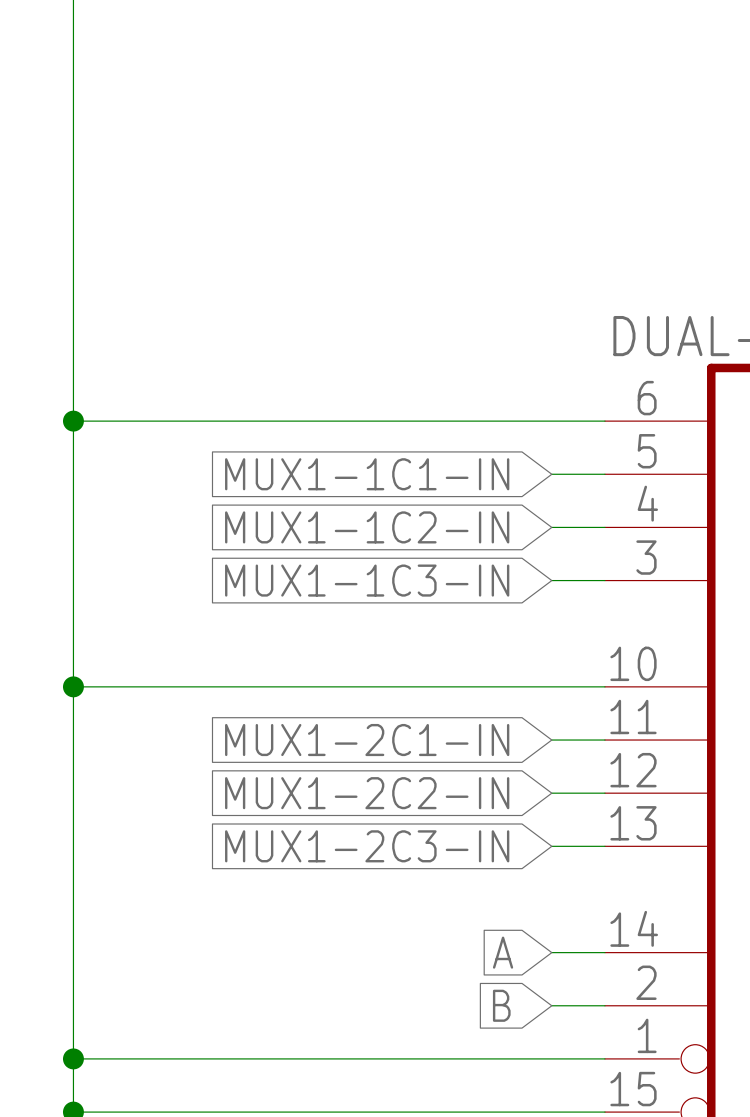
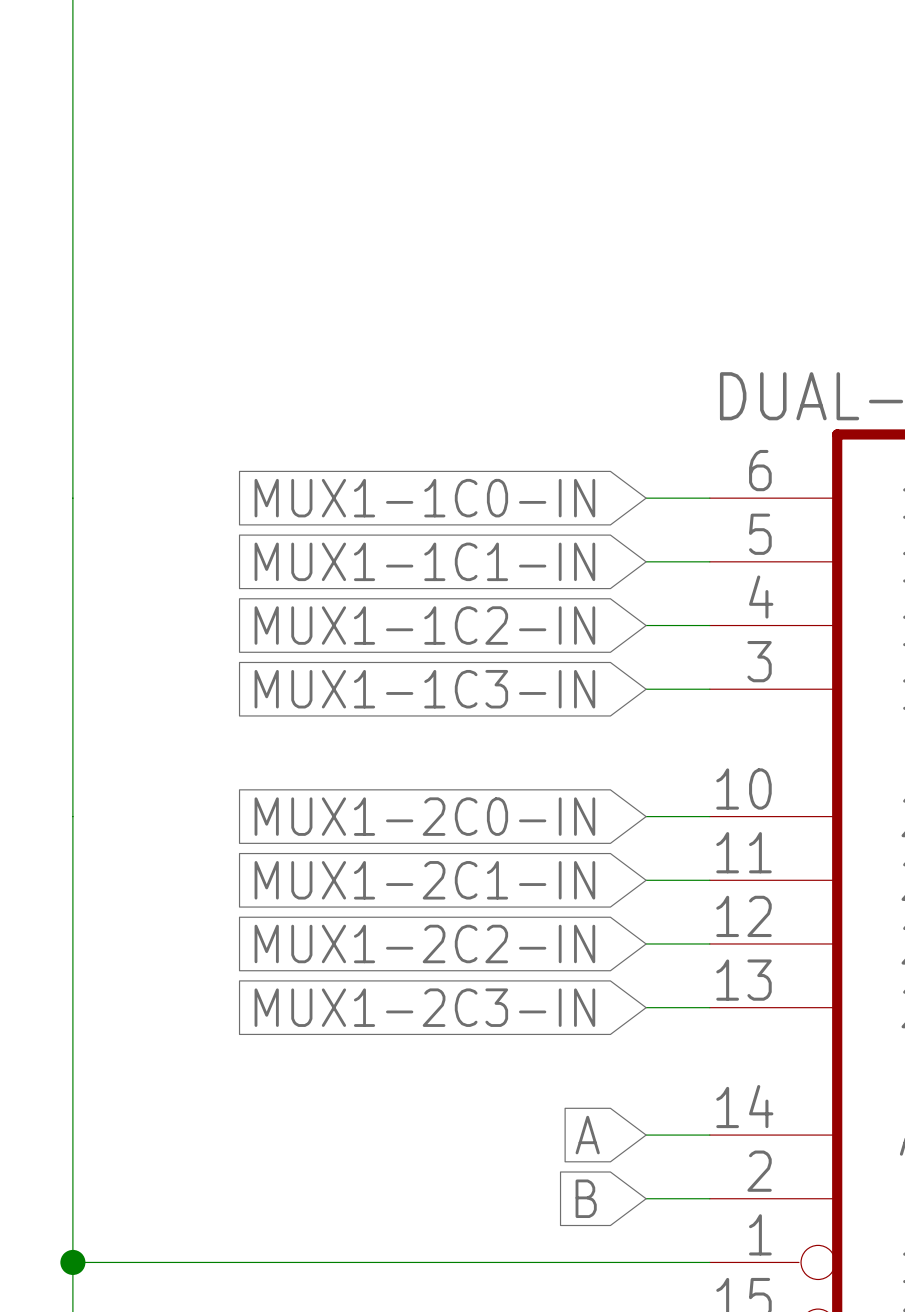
wire: (73, 421) (551, 421) -> none
junction: (73, 421) -> none
global label: none -> MUX1-1C0-IN (424, 498)
wire: (73, 686) (551, 686) -> none
junction: (73, 686) -> none
global label: none -> MUX1-2C0-IN (424, 816)

